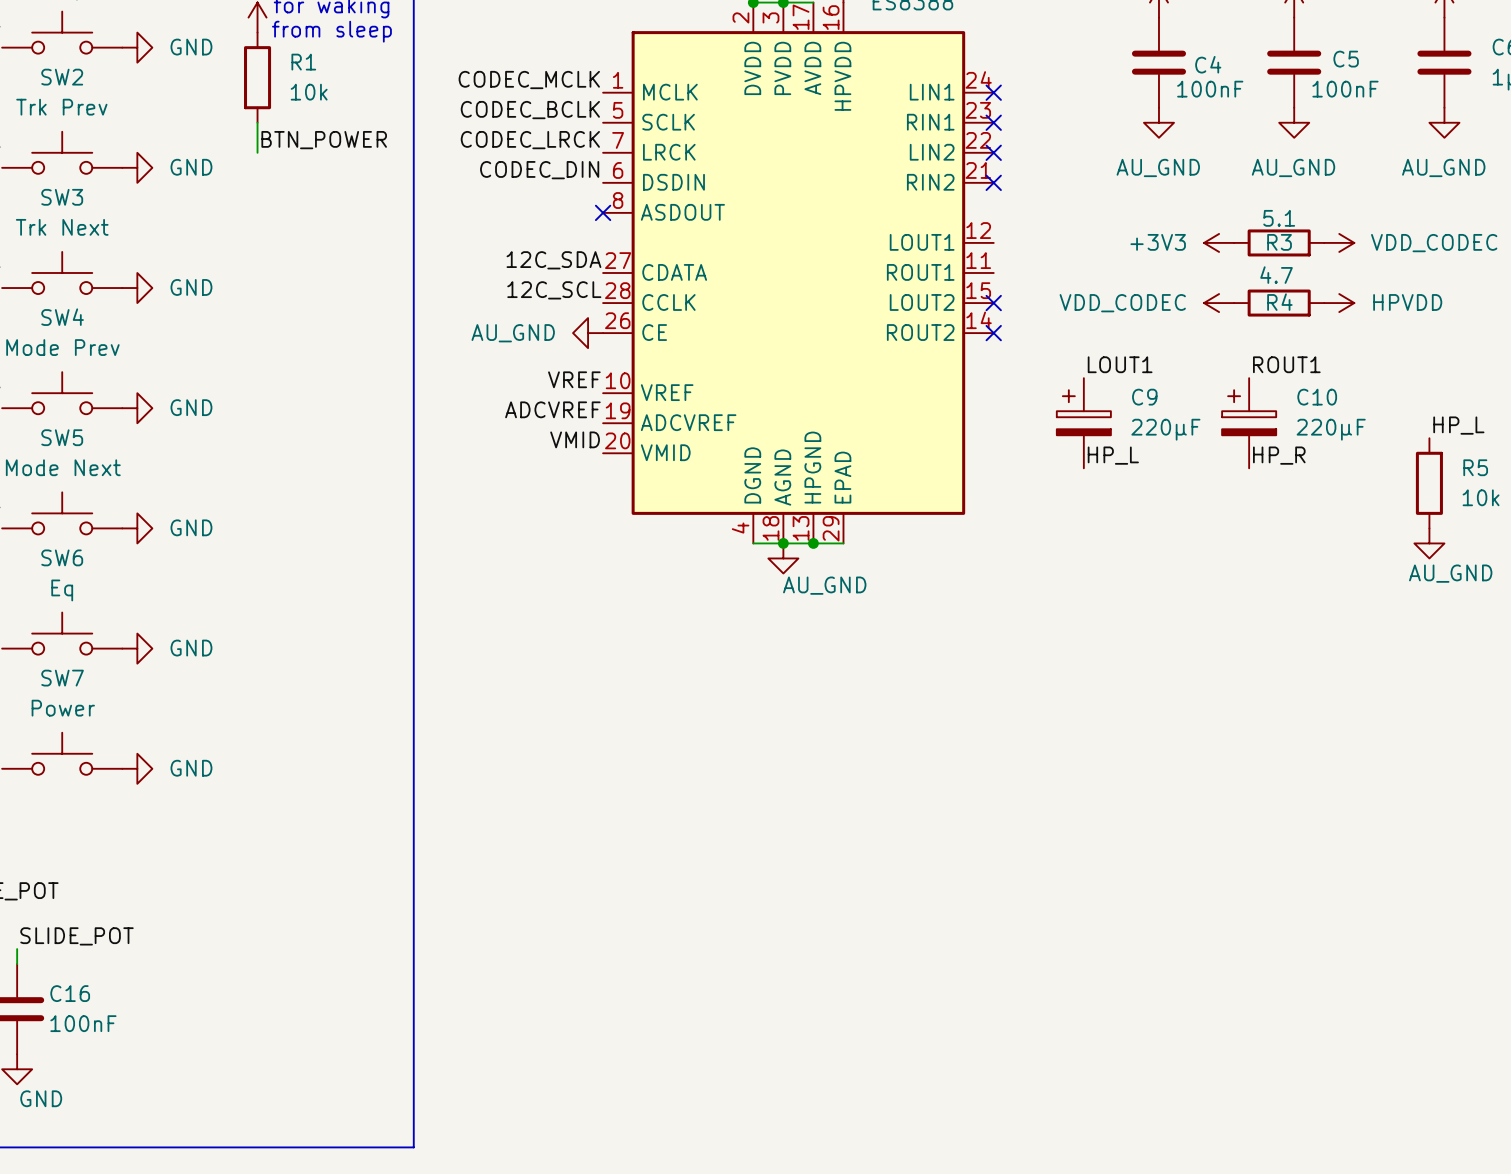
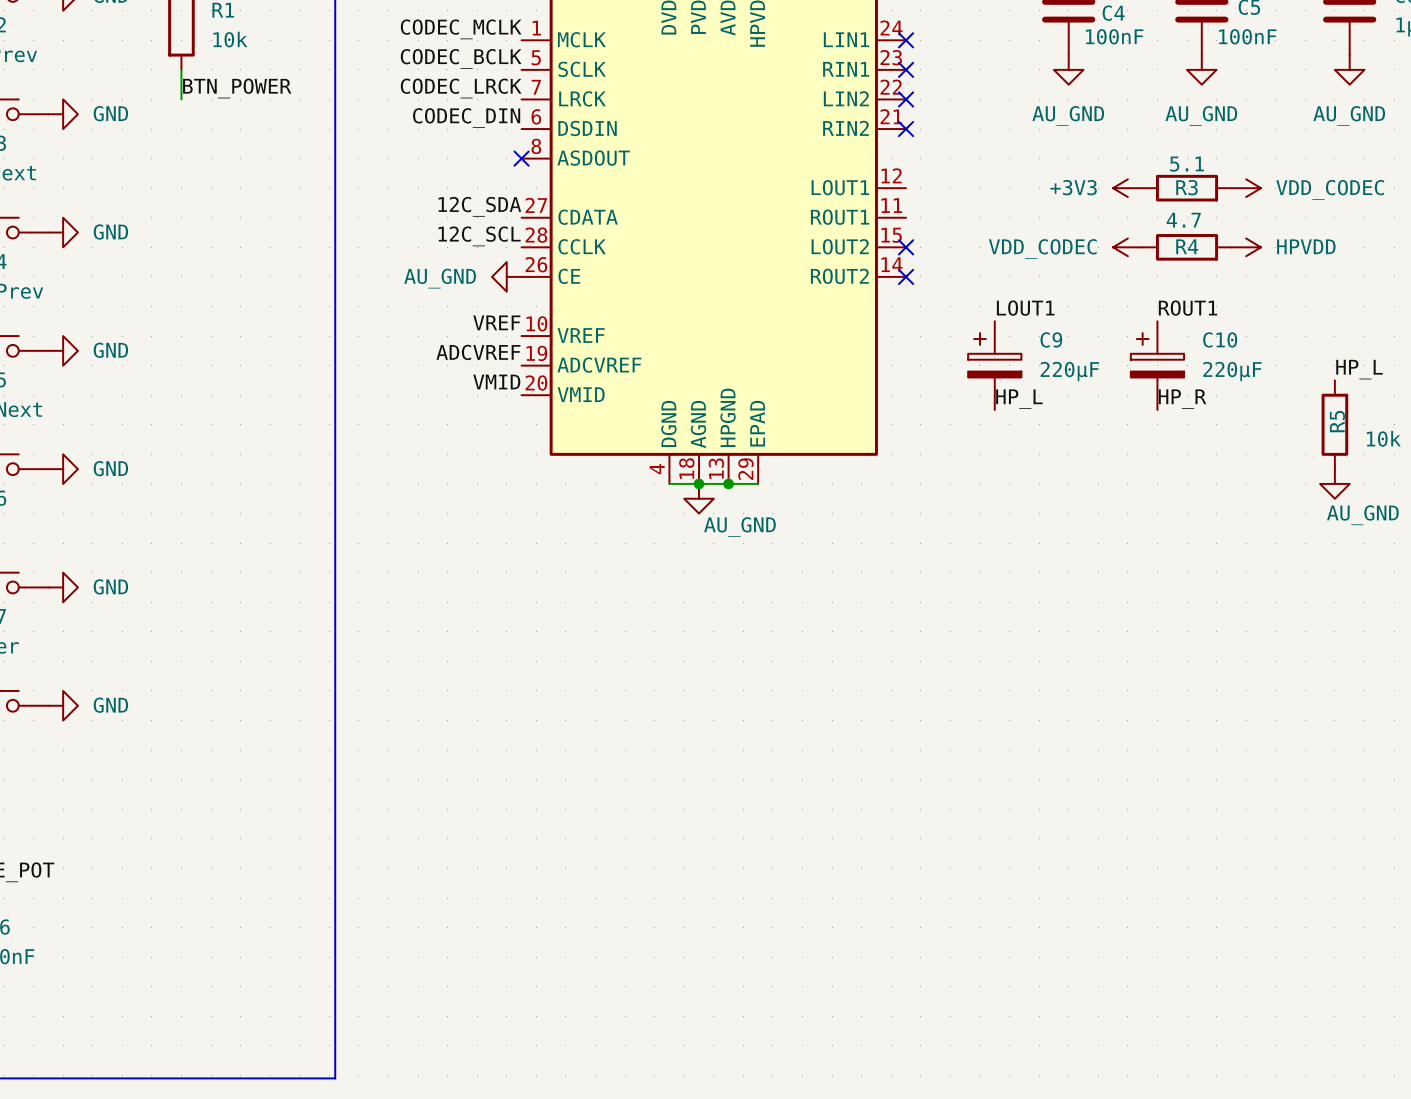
R5 name rotation: 0° (1475, 467) -> 90° counterclockwise (1337, 421)
R5 name position: R5 (1475, 467) -> R5 (1337, 421)

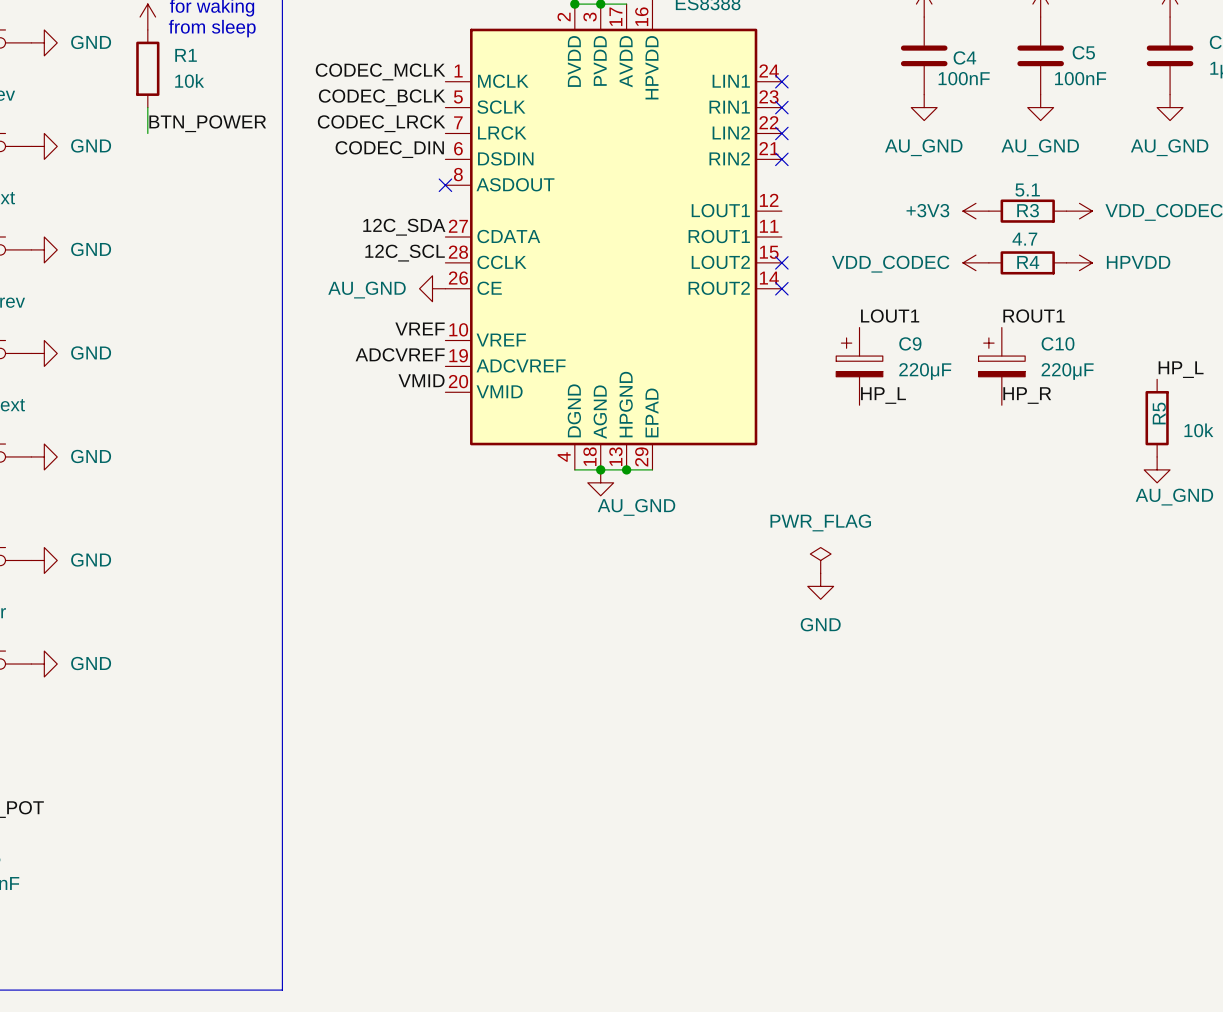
power symbol: none -> PWR_FLAG (820, 560)
power symbol: none -> GND (820, 586)

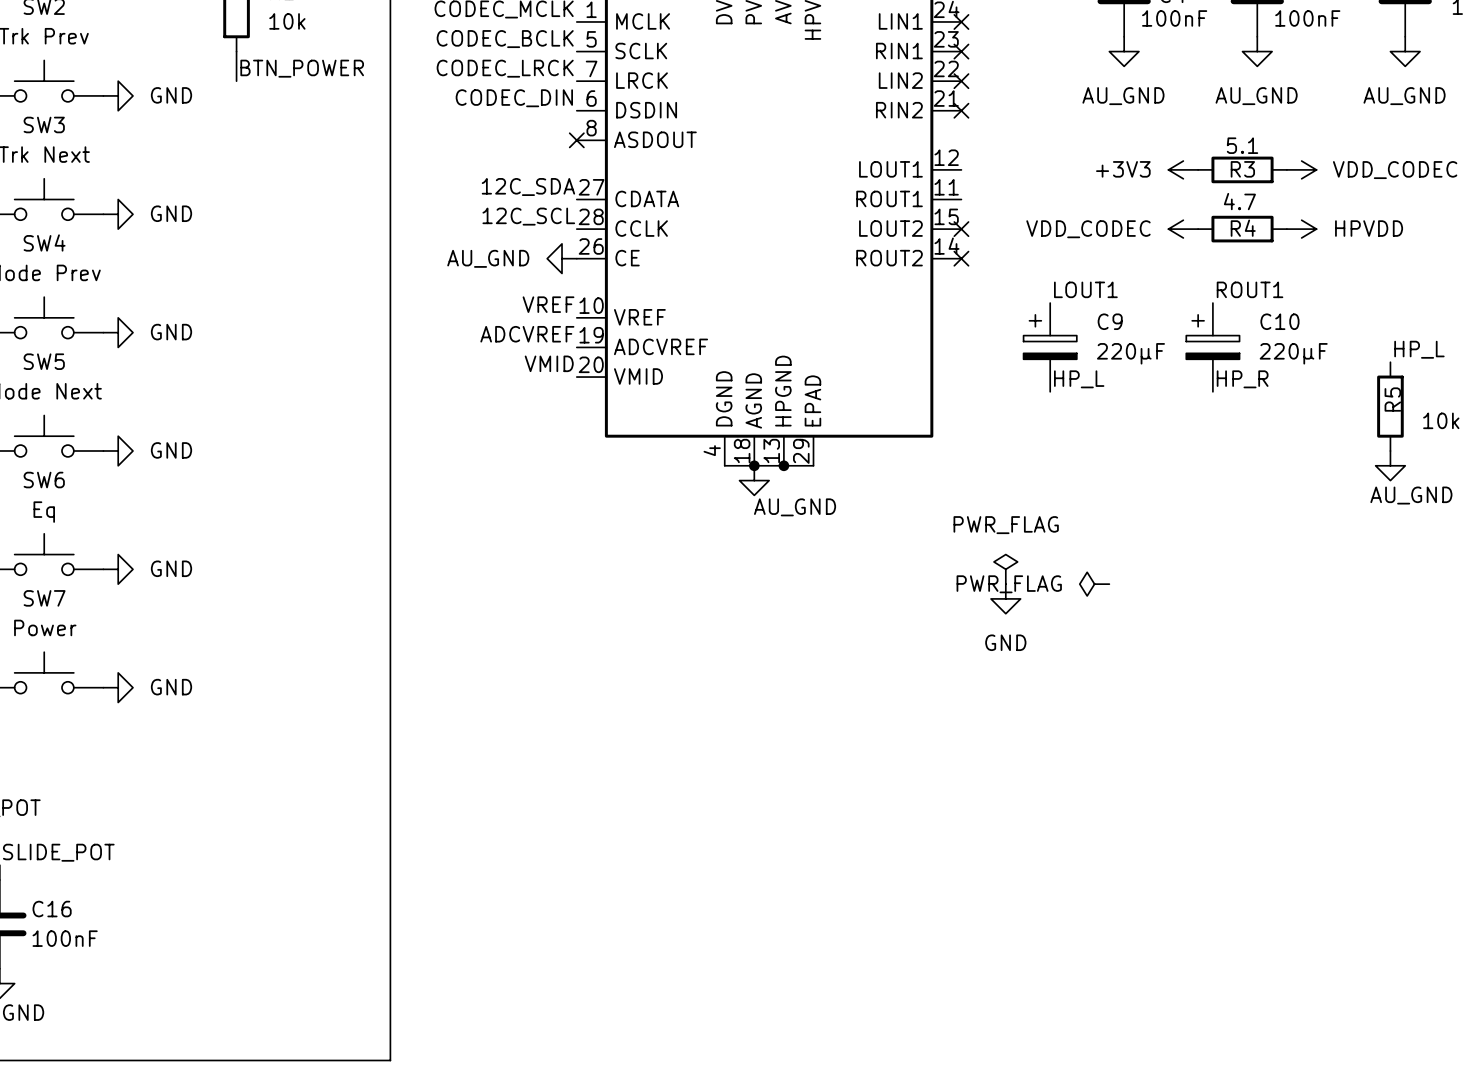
power symbol: none -> PWR_FLAG (1094, 584)

